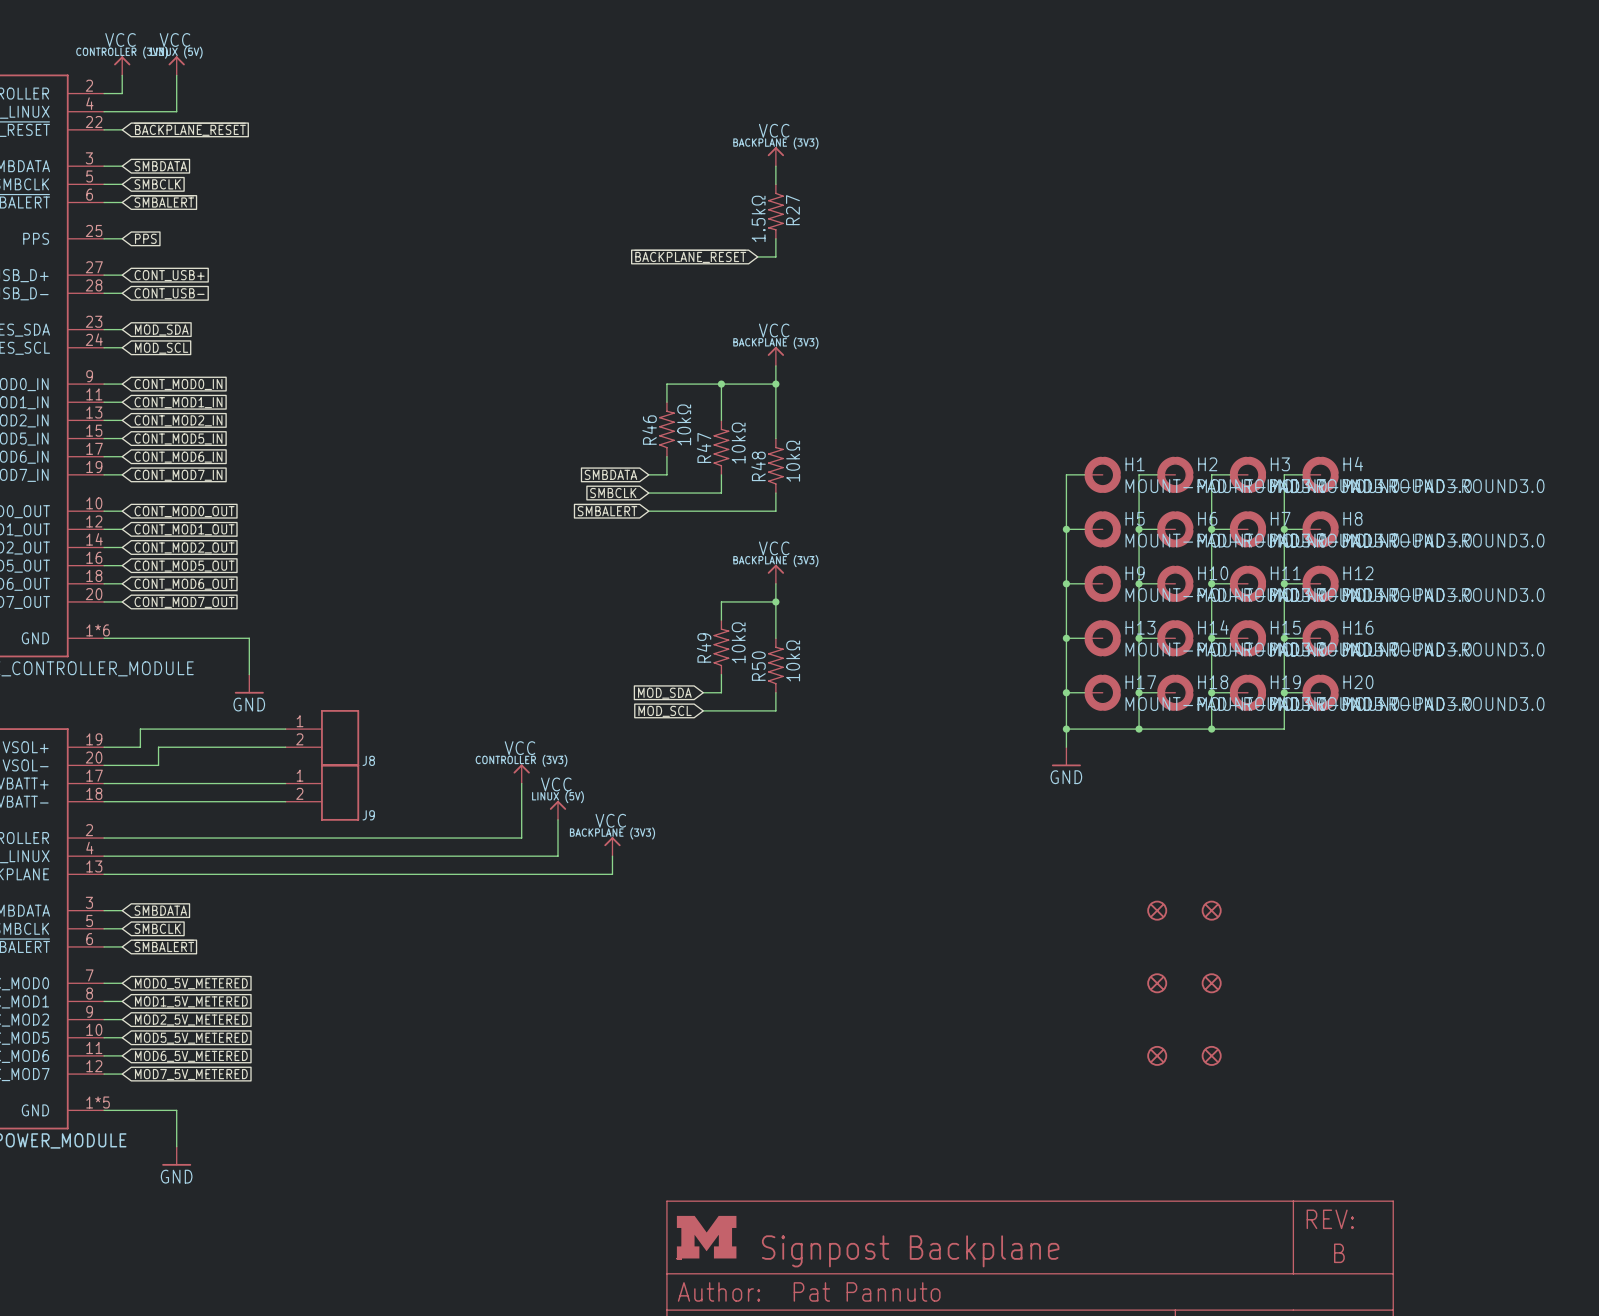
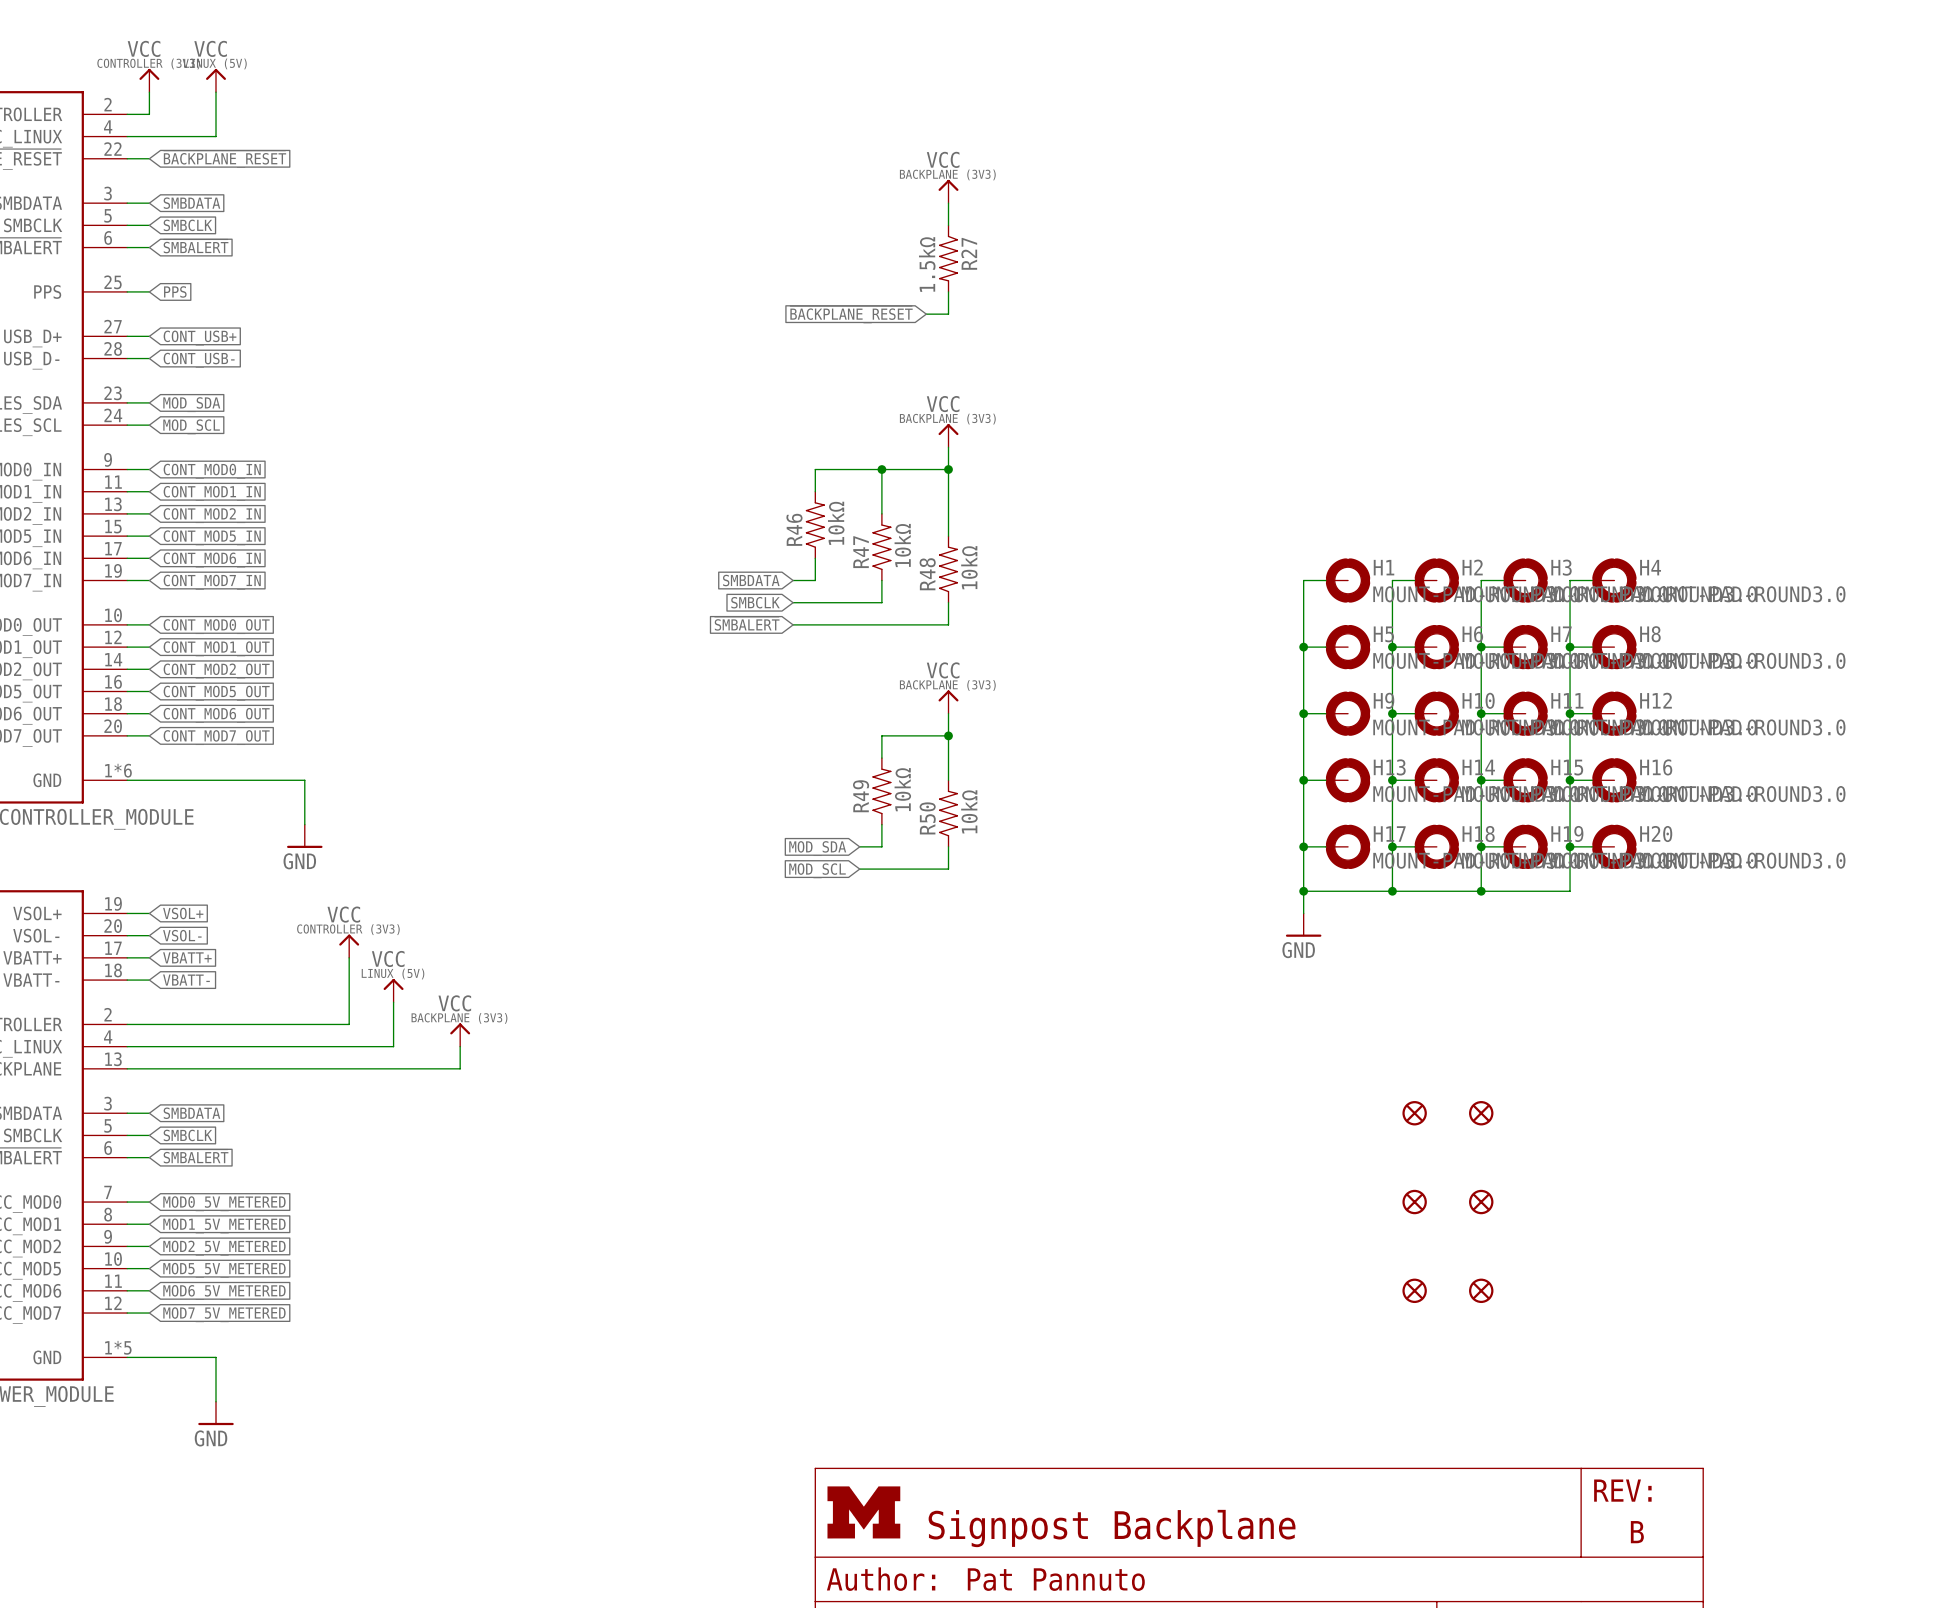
wire: (285, 729) (140, 729) (140, 747) (122, 747) -> none
J8: (322, 738) -> none
global label: none -> VSOL+ (183, 913)
wire: (285, 747) (158, 747) (158, 765) (122, 765) -> none
global label: none -> VSOL- (182, 935)
power symbol: none -> (349, 946)
power symbol: (521, 774) -> none
wire: (122, 783) (285, 783) -> (349, 1024) (349, 957)
global label: none -> VBATT+ (187, 957)
wire: (521, 783) (521, 838) (285, 838) -> none
J9: (322, 792) -> none
wire: (122, 801) (285, 801) -> none
global label: none -> VBATT- (186, 980)
power symbol: none -> (393, 990)
power symbol: (558, 810) -> none
wire: (558, 819) (558, 856) (321, 856) -> (393, 1002) (393, 1046)
power symbol: none -> (460, 1034)
power symbol: (612, 846) -> none
wire: (612, 856) (612, 874) (376, 874) -> (460, 1046) (460, 1068)

